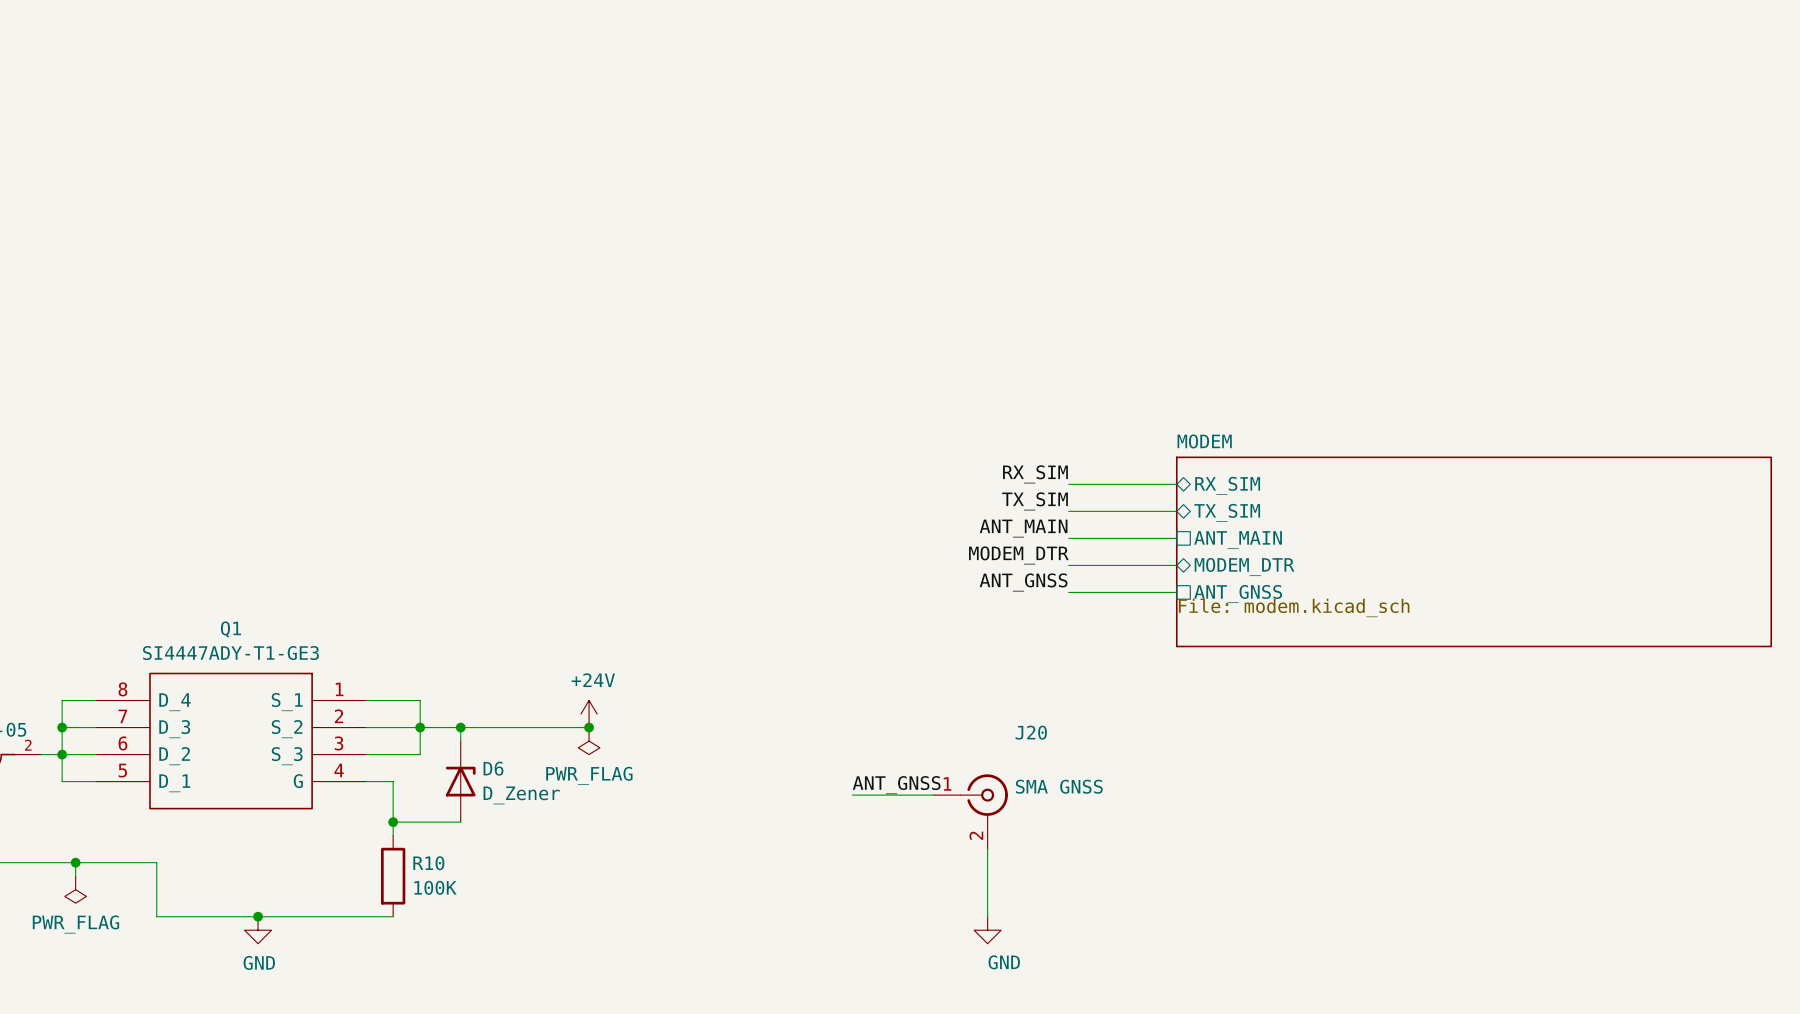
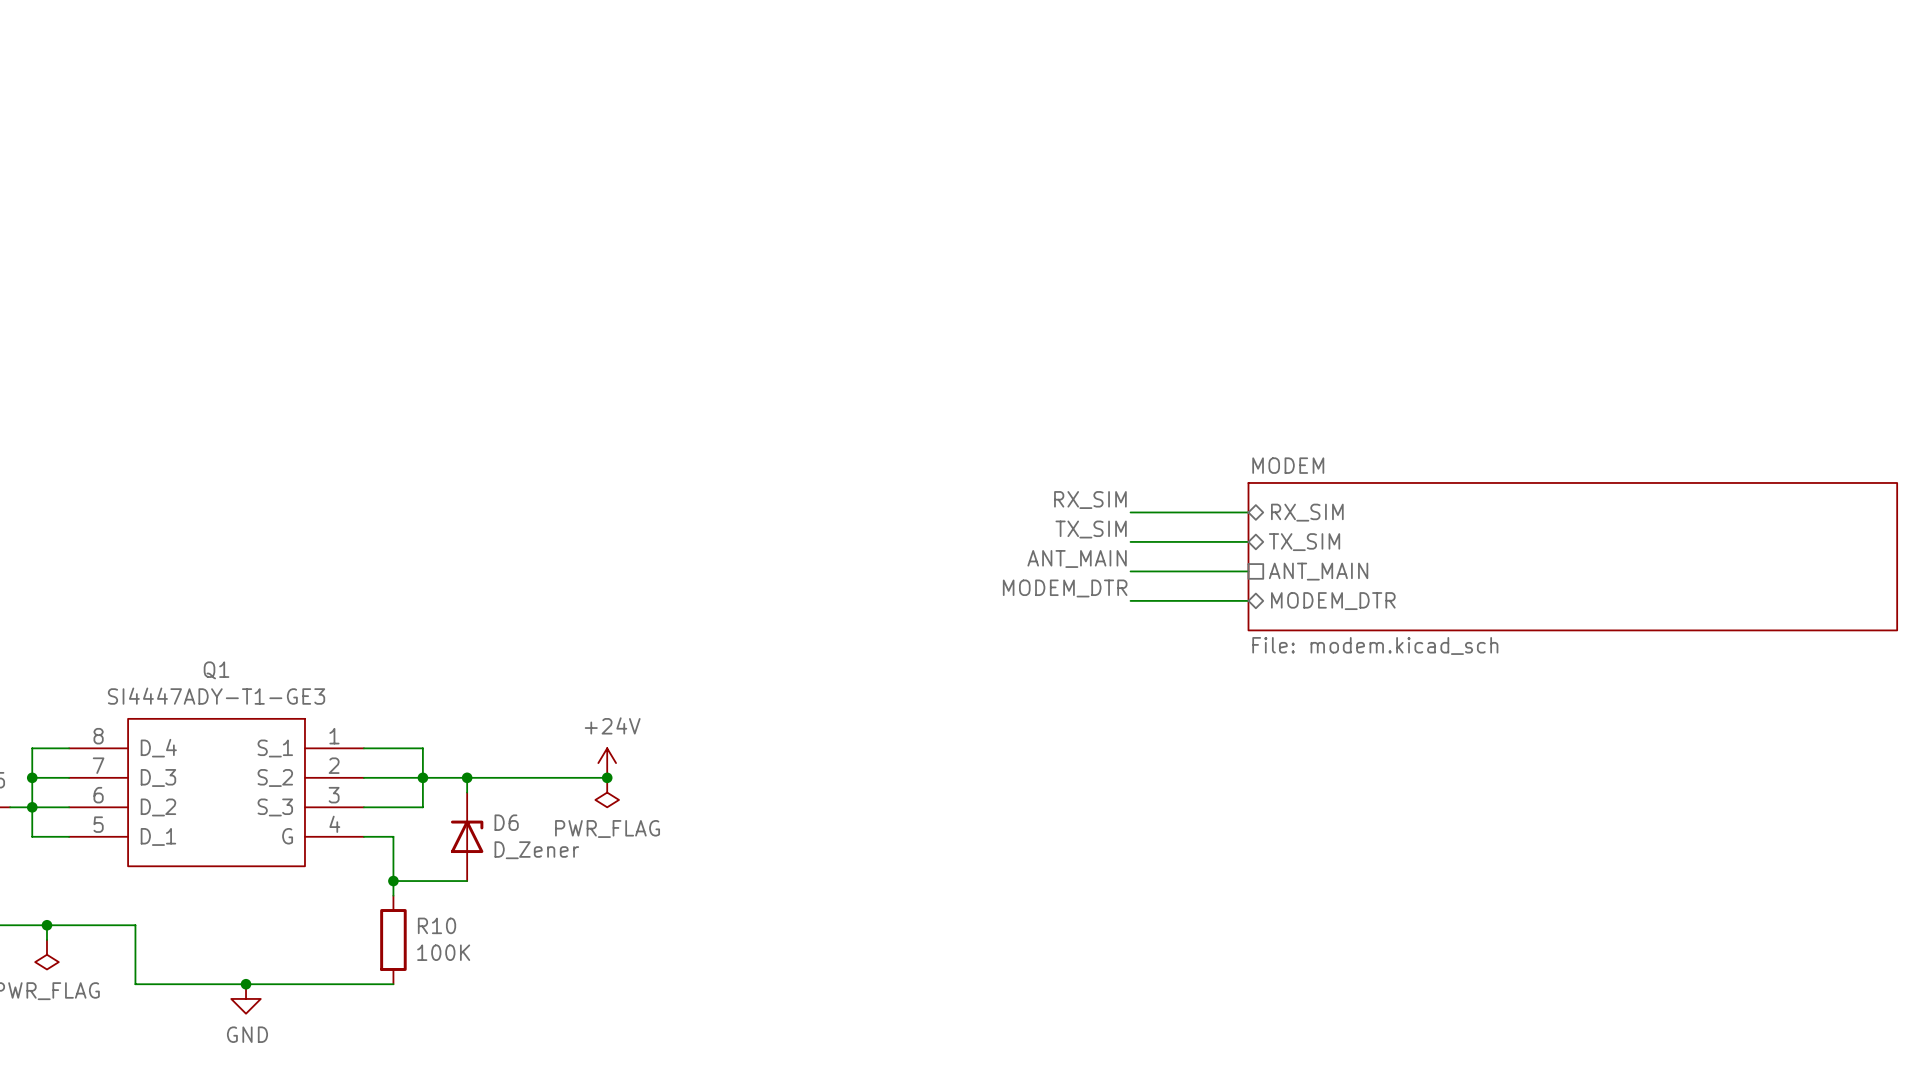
sheet MODEM: none -> File: modem.kicad_sch (1572, 556)
sheet MODEM: File: modem.kicad_sch (1474, 551) -> none
label: ANT_GNSS (1023, 582) -> none
wire: (1068, 592) (1176, 592) -> none
sheet pin: ANT_GNSS (1238, 594) -> none
label: ANT_GNSS (896, 785) -> none
wire: (852, 795) (933, 795) -> none
J20: SMA GNSS (970, 811) -> none
wire: (987, 849) (987, 916) -> none
power symbol: GND (987, 930) -> none

